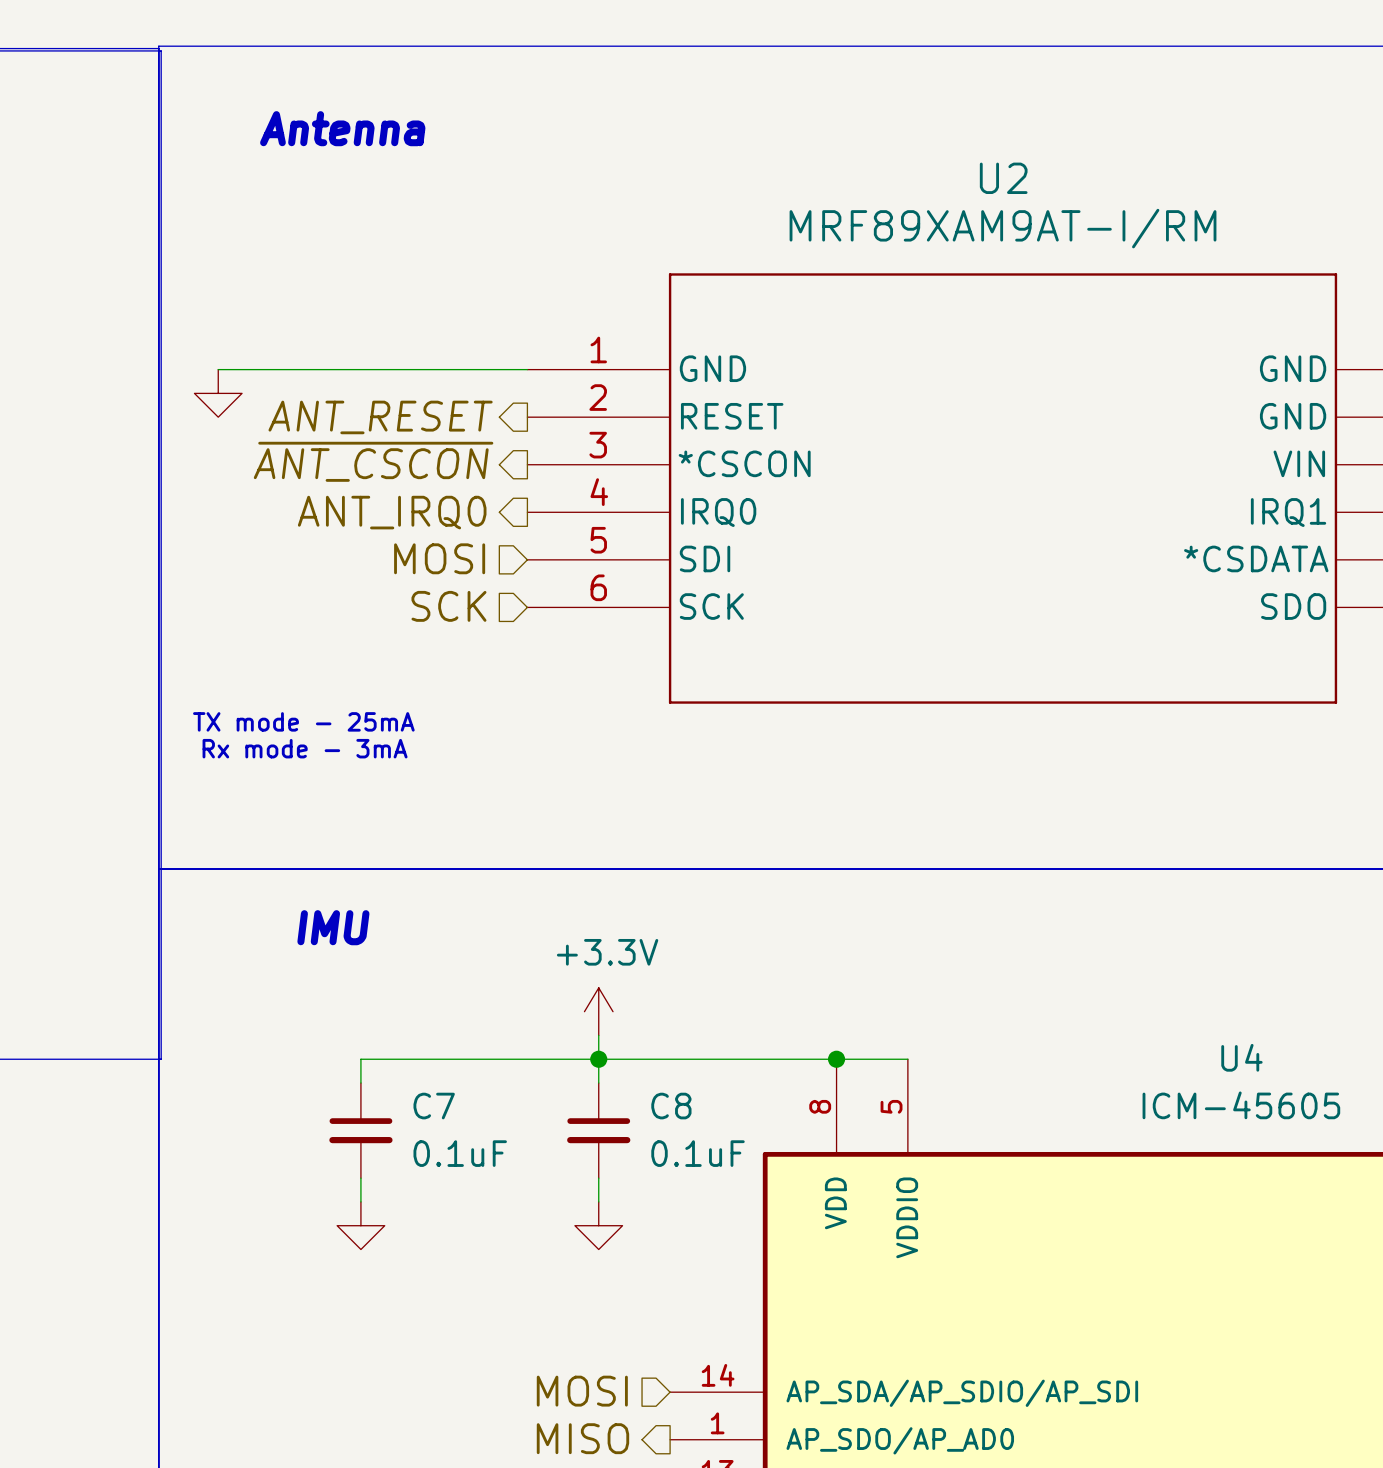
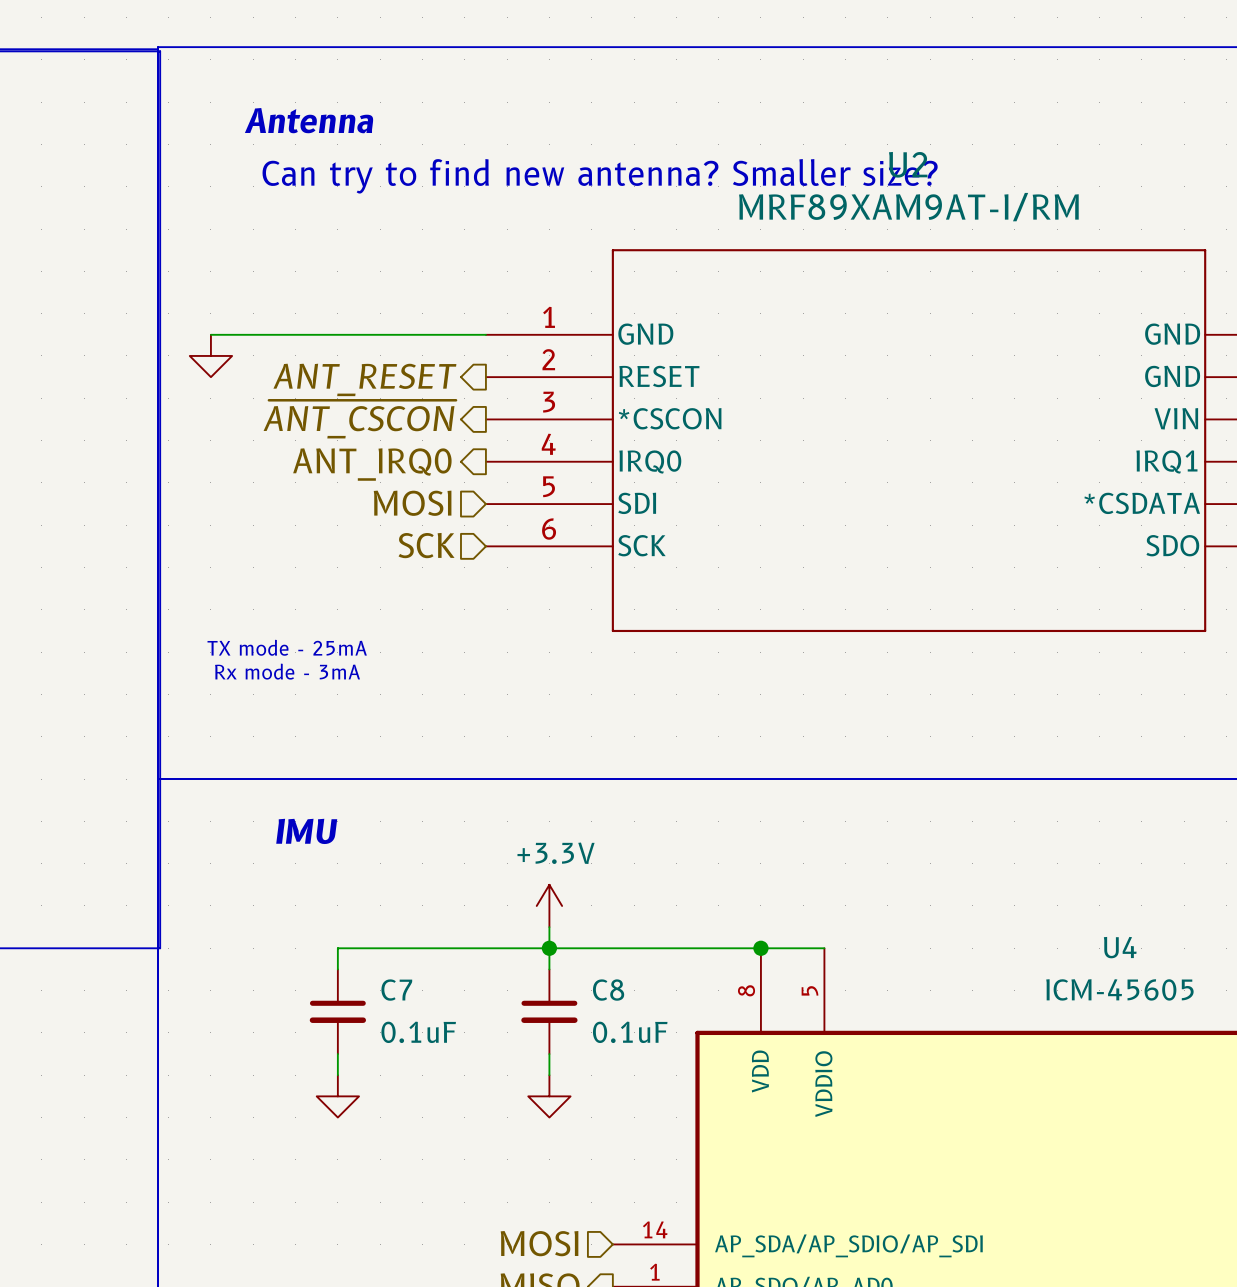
text: none -> Can try to find new antenna? Smaller size? (600, 176)

